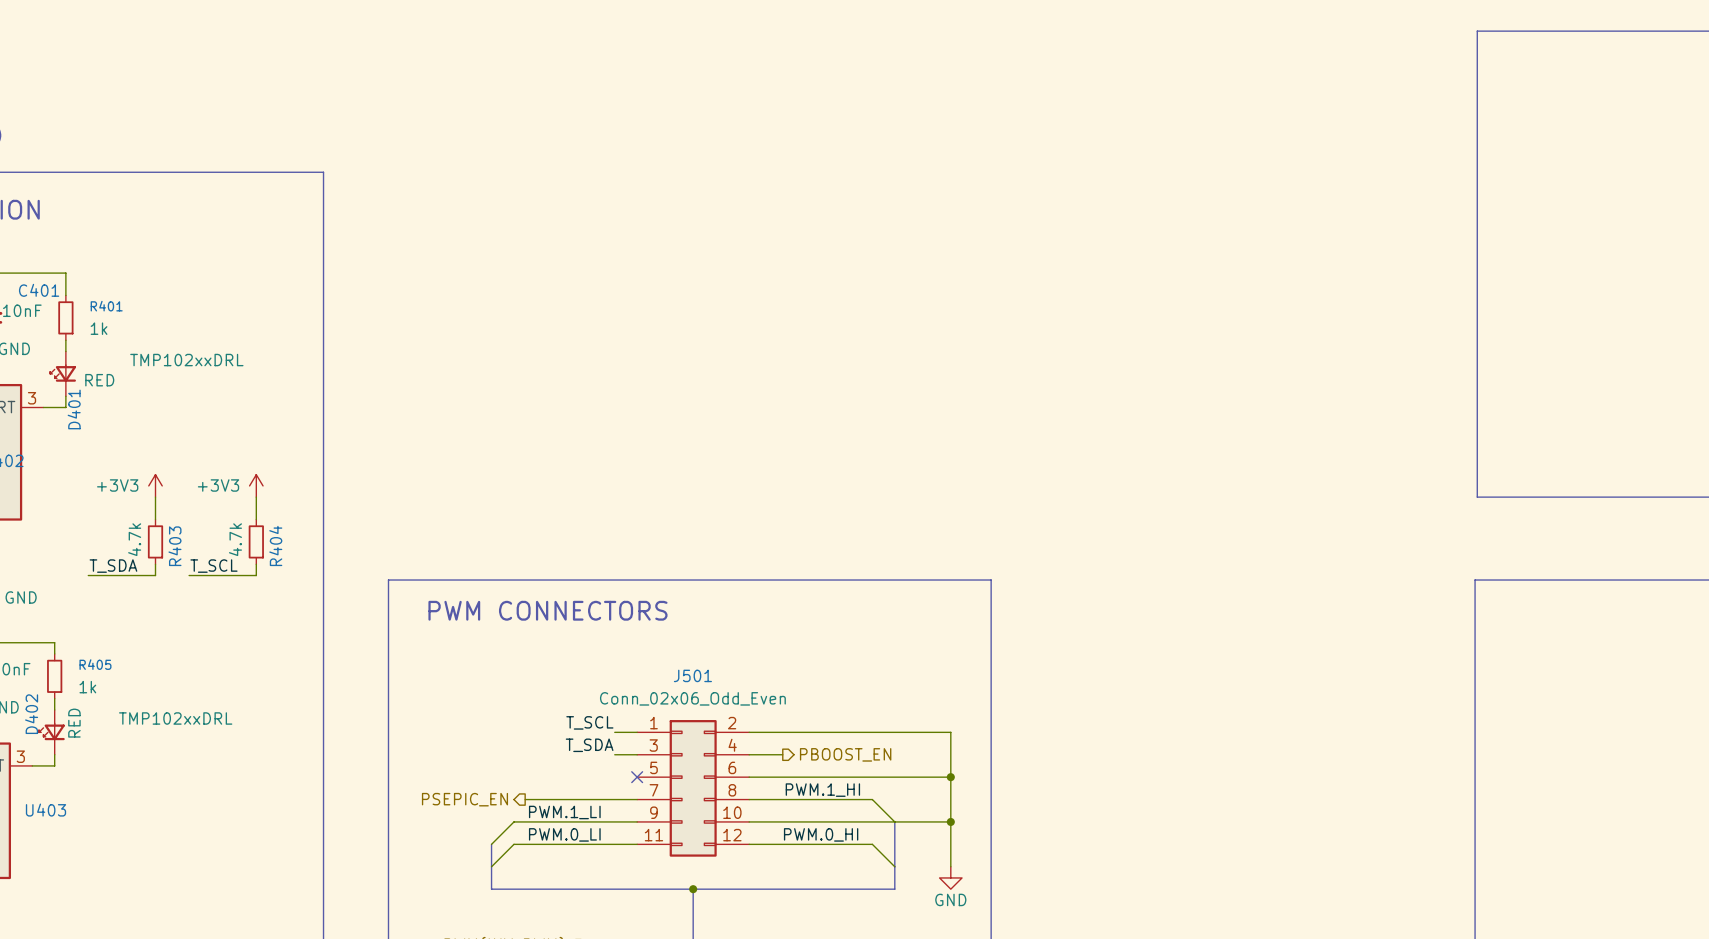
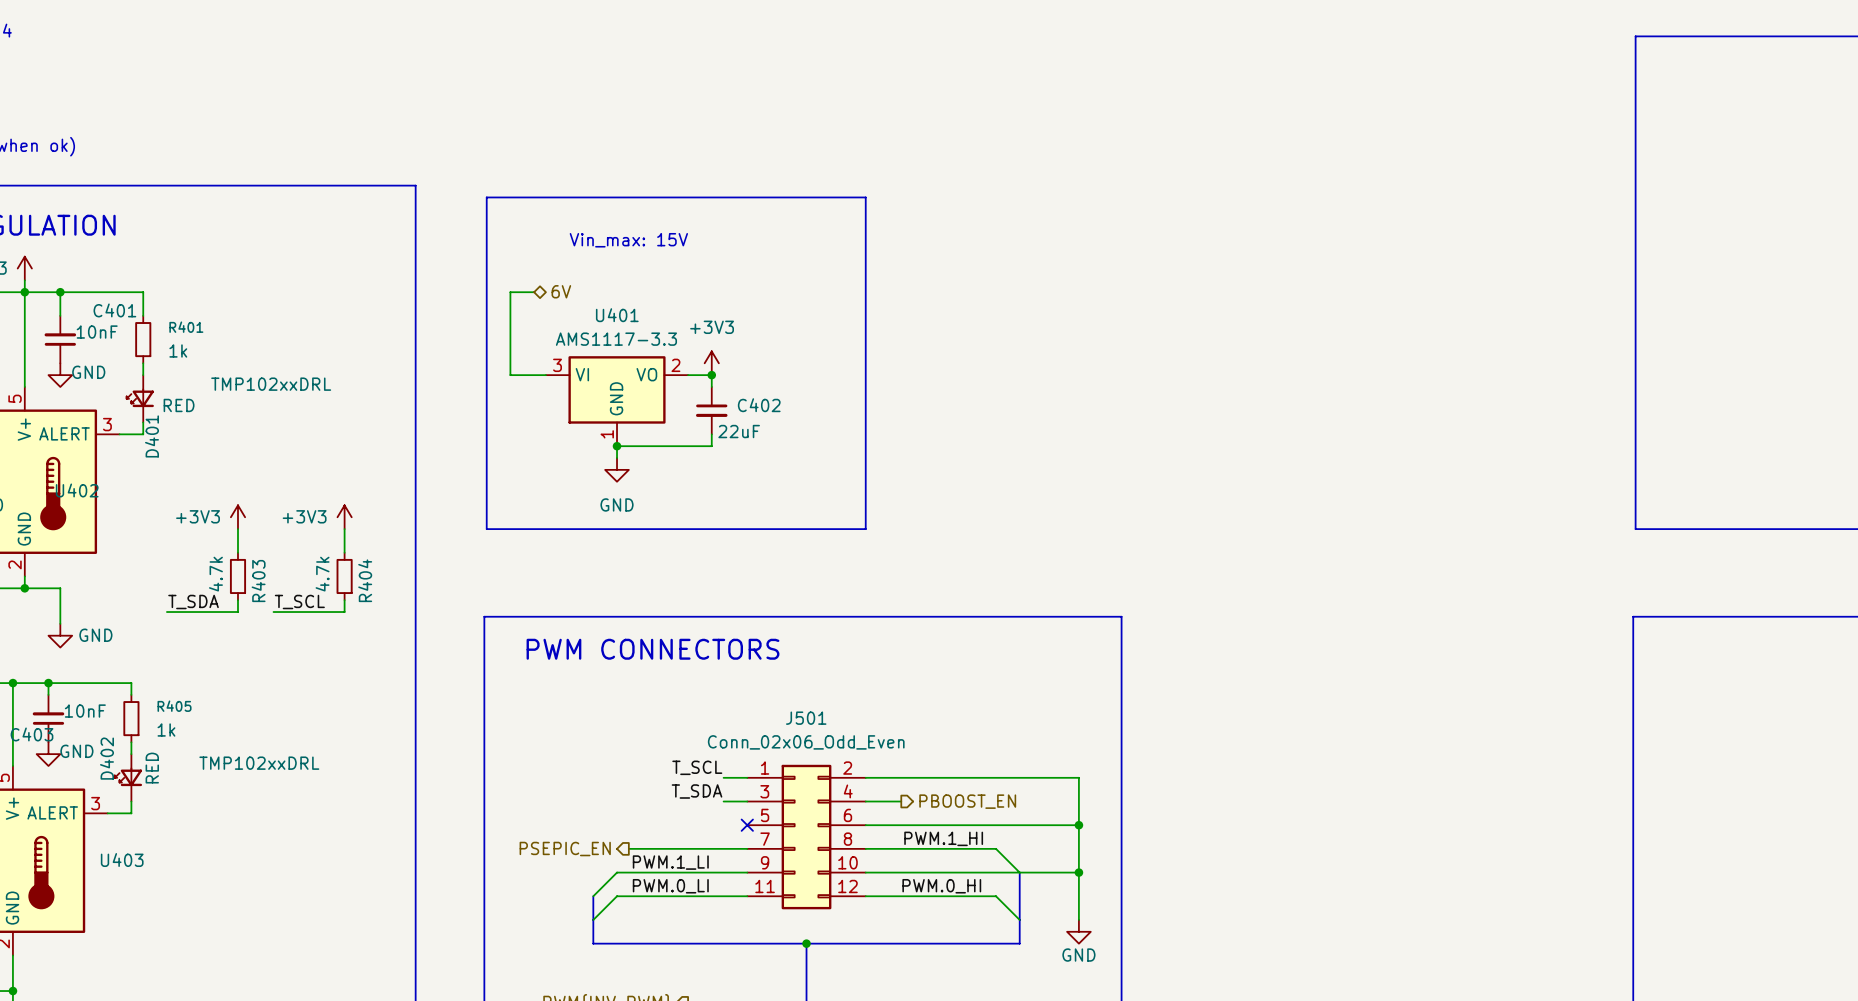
line: none -> (486, 197) (865, 197) (865, 529) (486, 529) (486, 197)
text: none -> Vin_max: 15V (628, 240)
hierarchical label: none -> 6V (561, 291)
wire: none -> (534, 292) (510, 292) (510, 375) (545, 375)
power symbol: none -> +3V3 (711, 363)
wire: none -> (688, 375) (711, 375) (711, 386)
junction: none -> (711, 375)
U401: none -> AMS1117-3.3 (617, 401)
C402: none -> 22uF (711, 410)
wire: none -> (711, 434) (711, 446) (617, 446) (617, 458)
junction: none -> (617, 446)
power symbol: none -> GND (617, 469)

